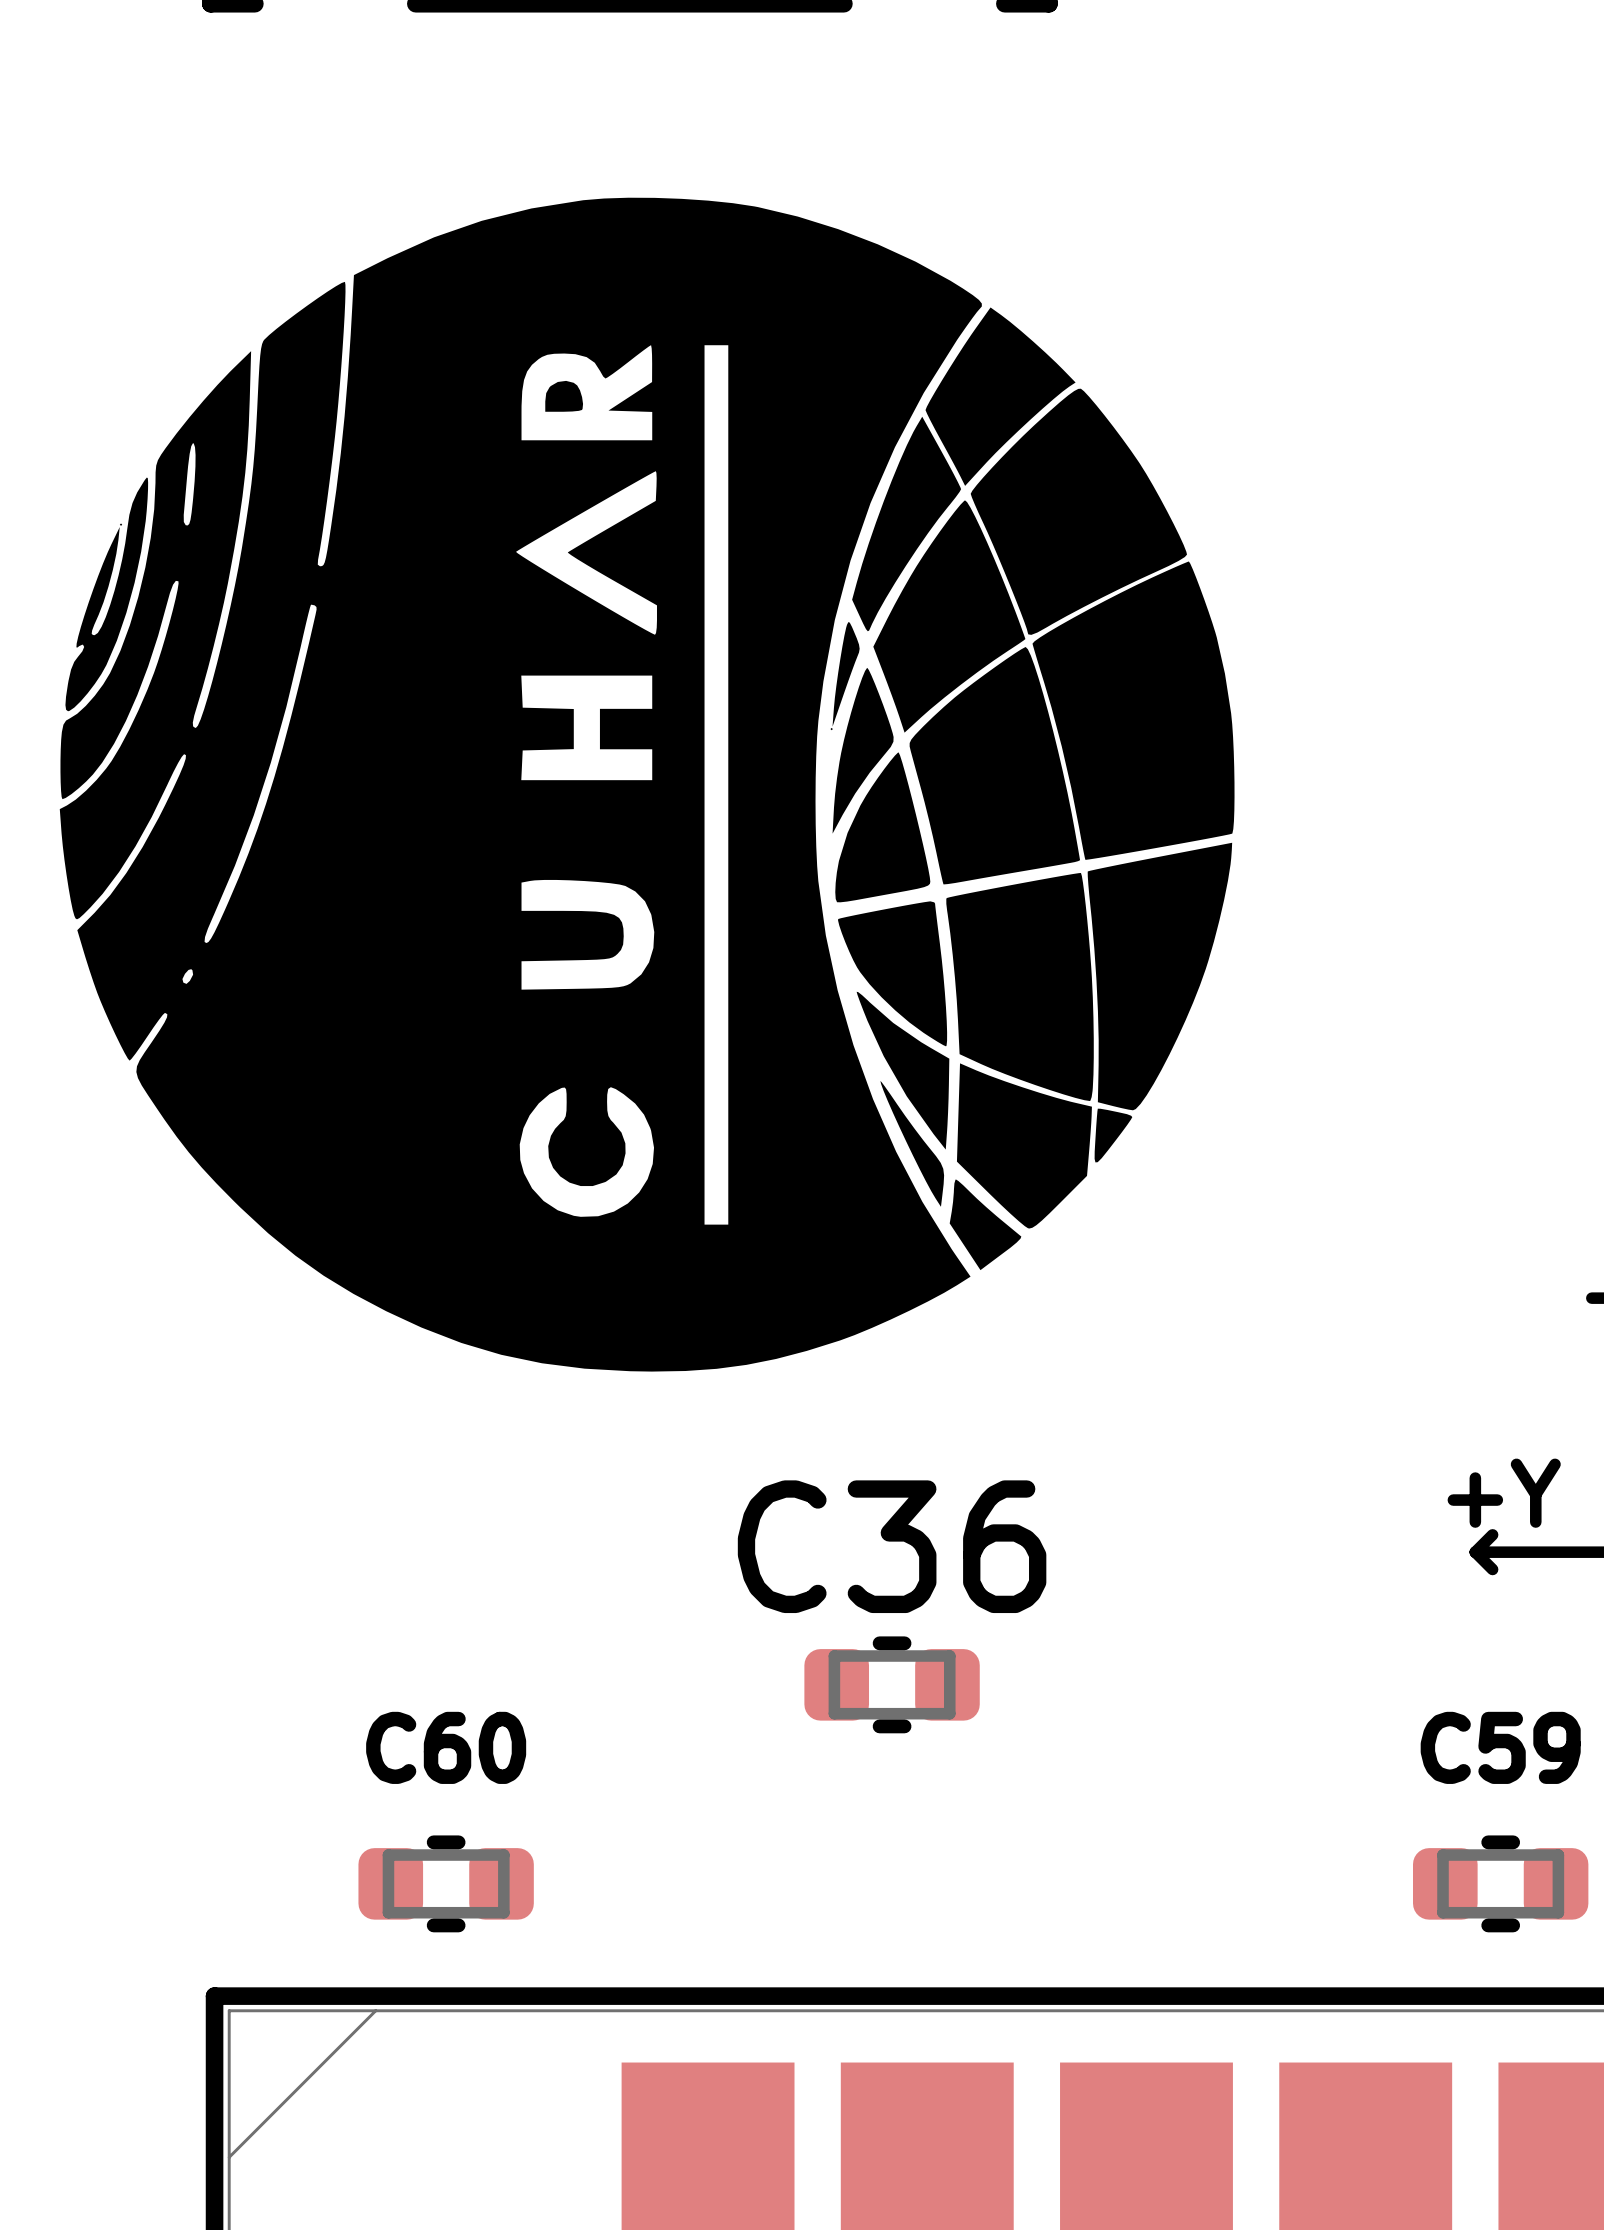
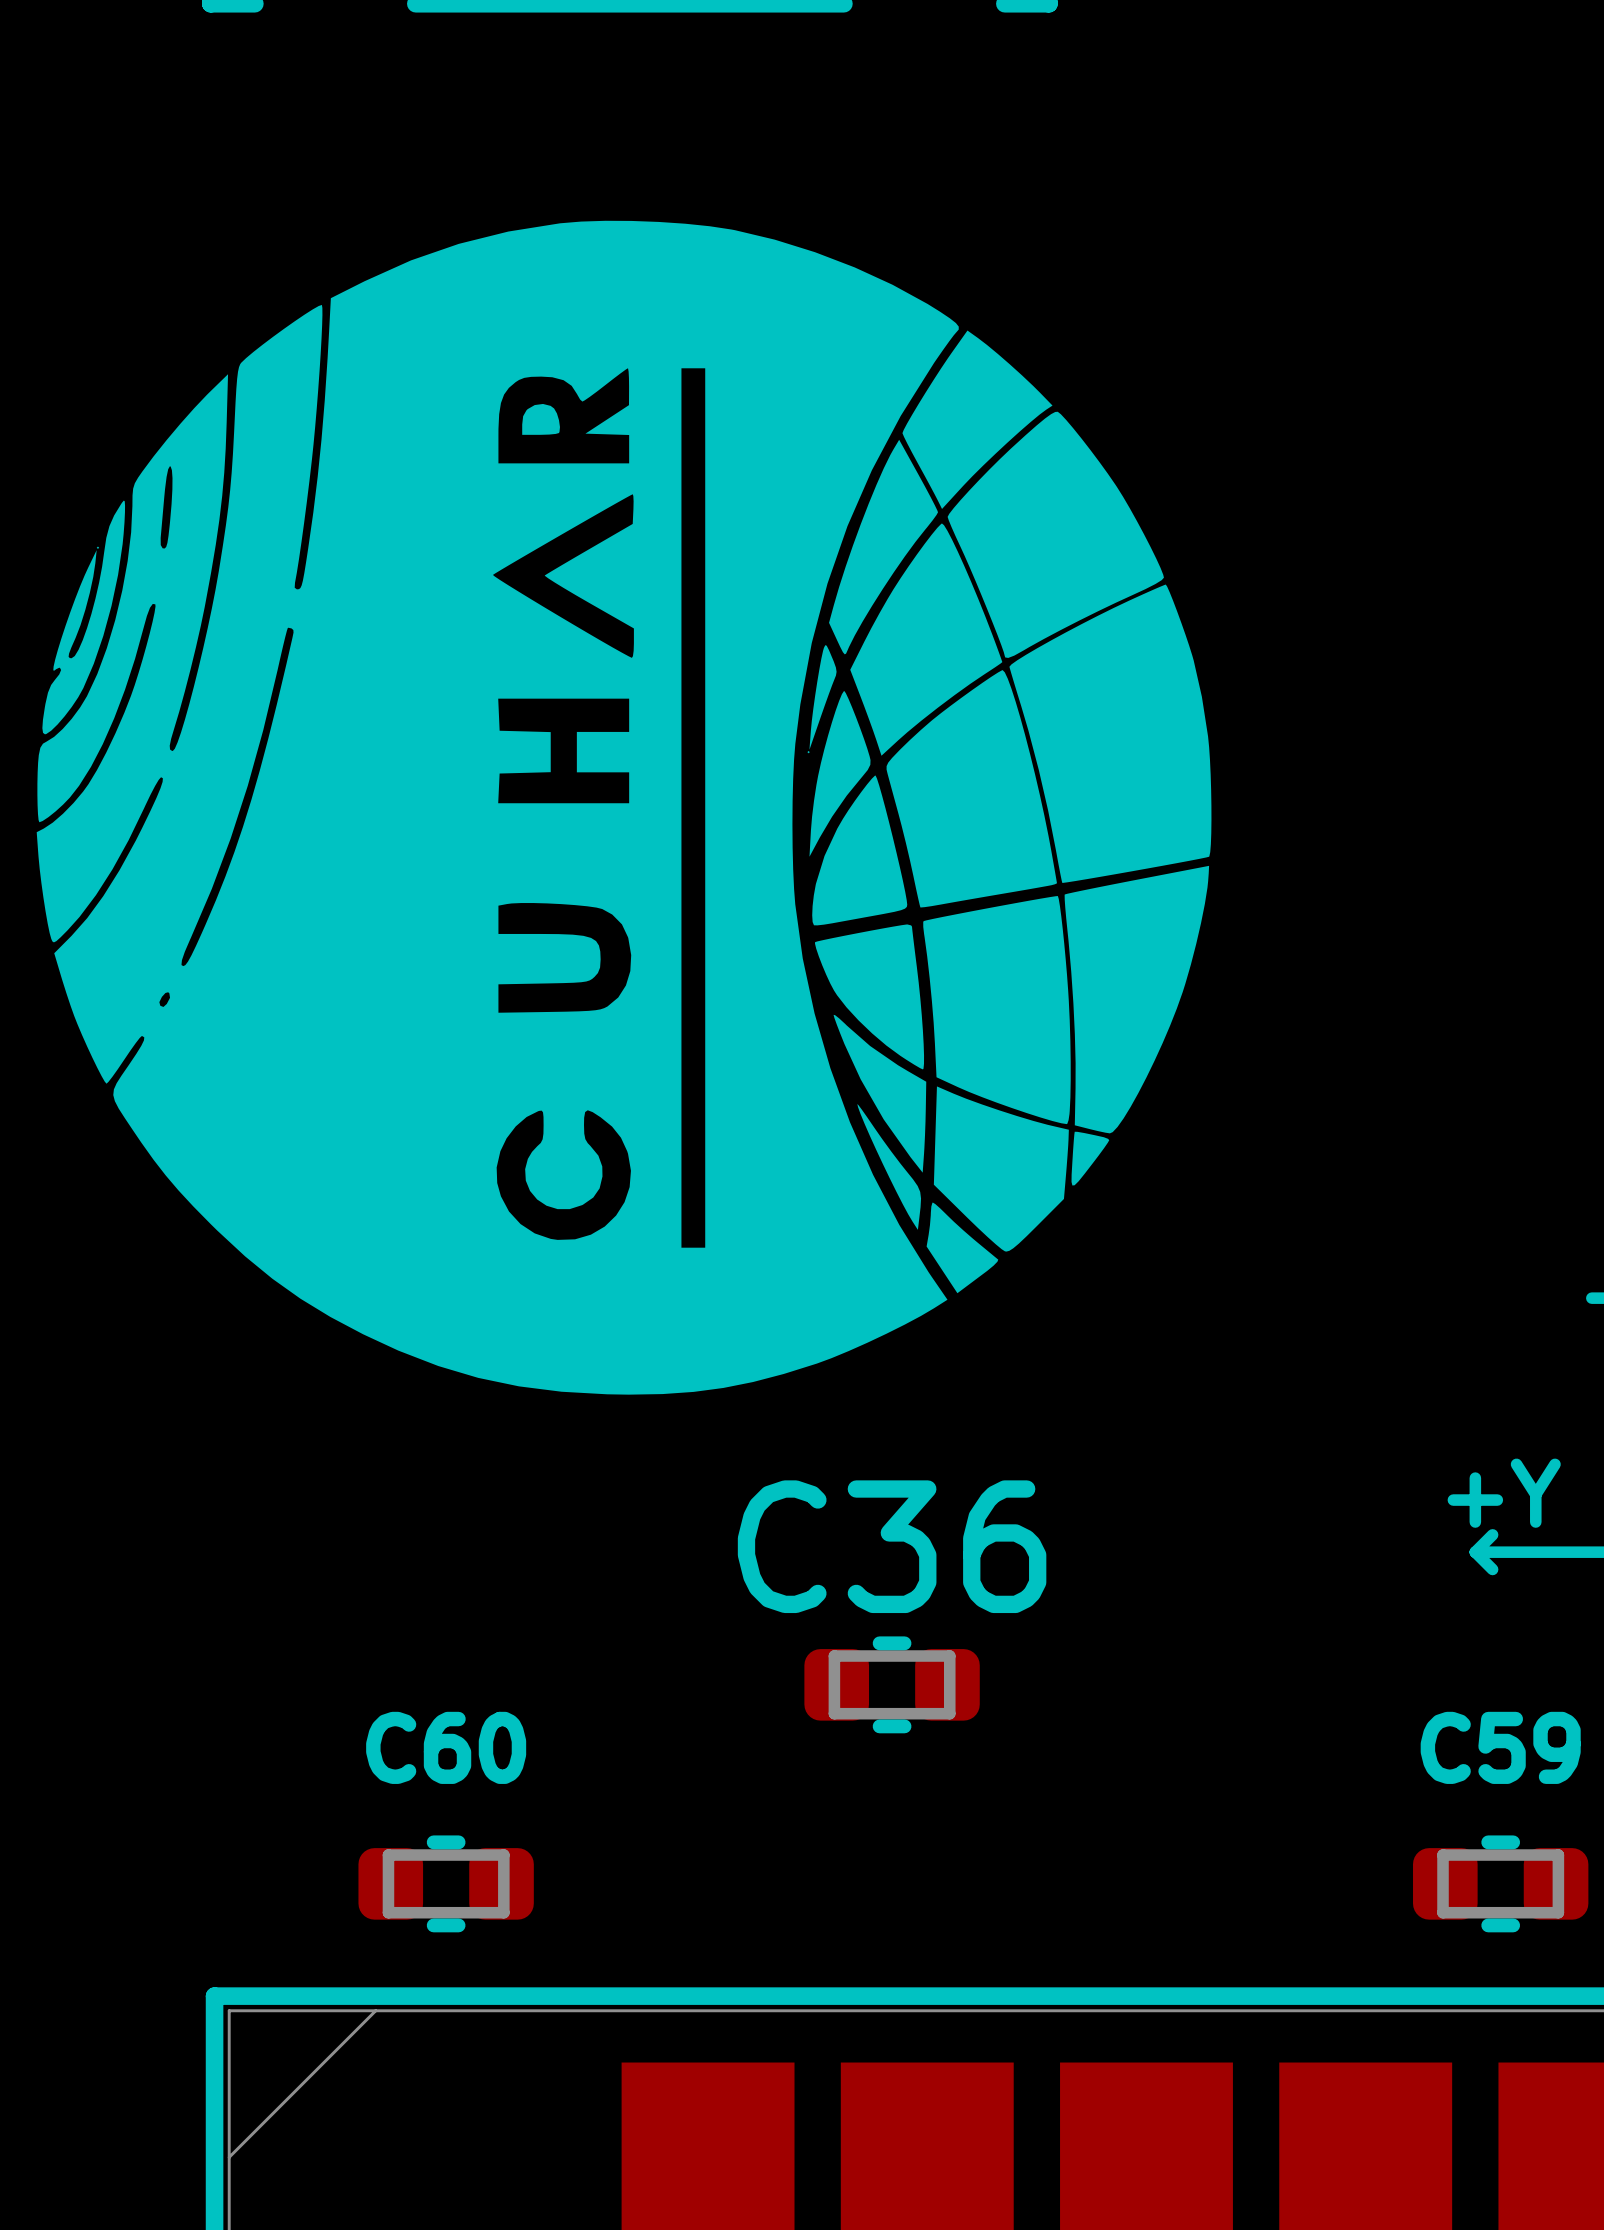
drawing position: (647, 784) -> (624, 807)

